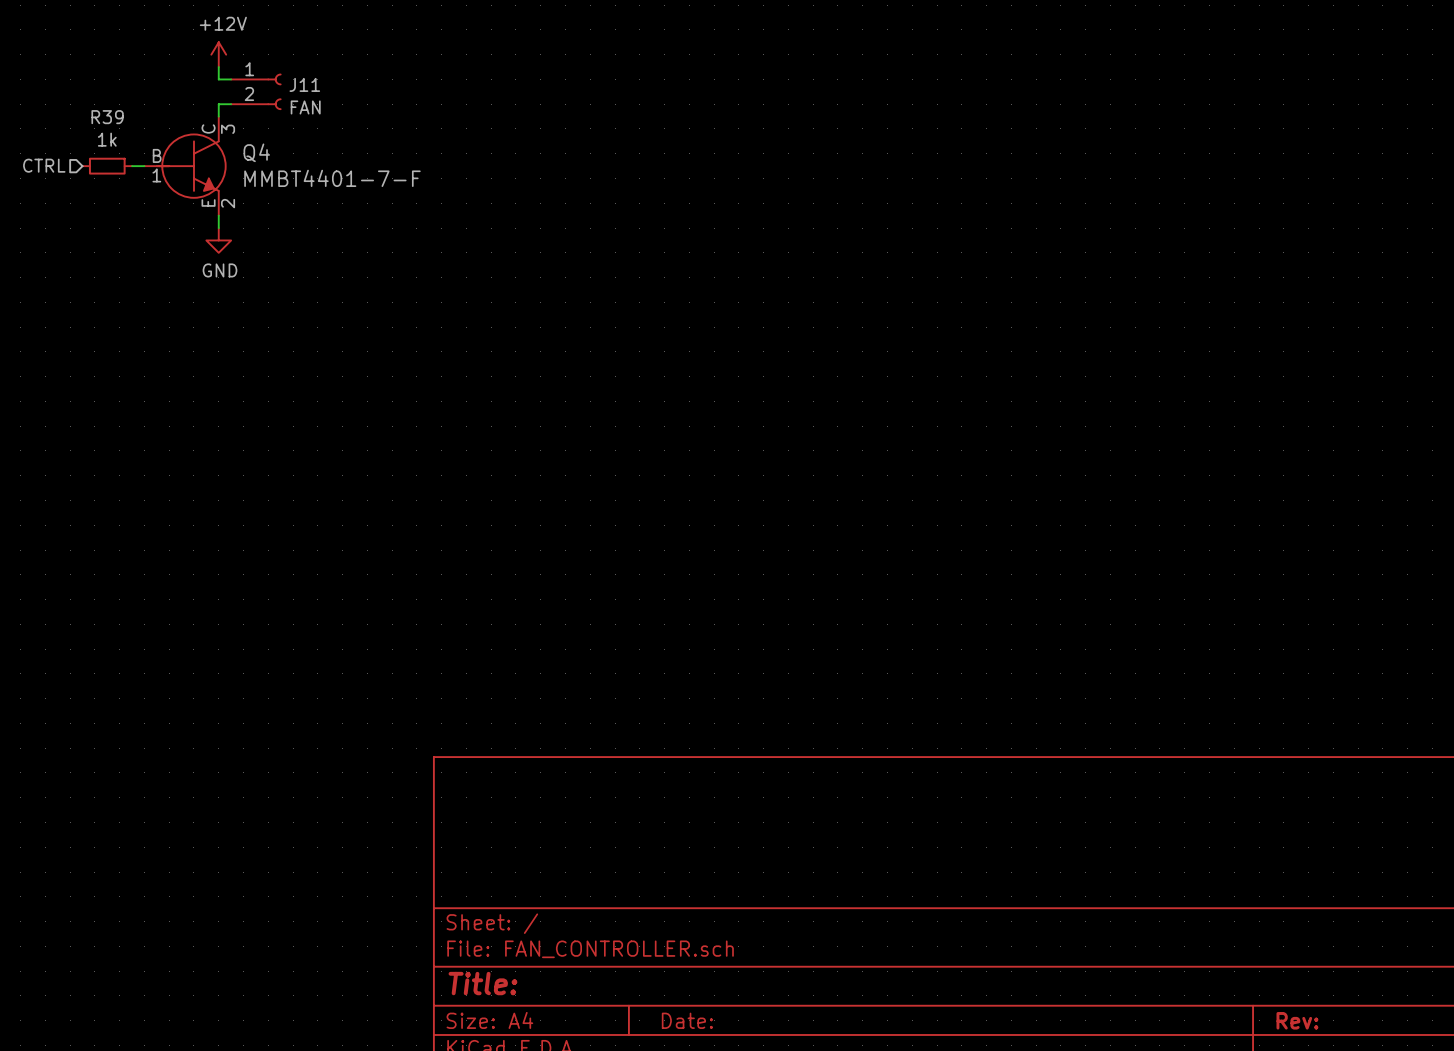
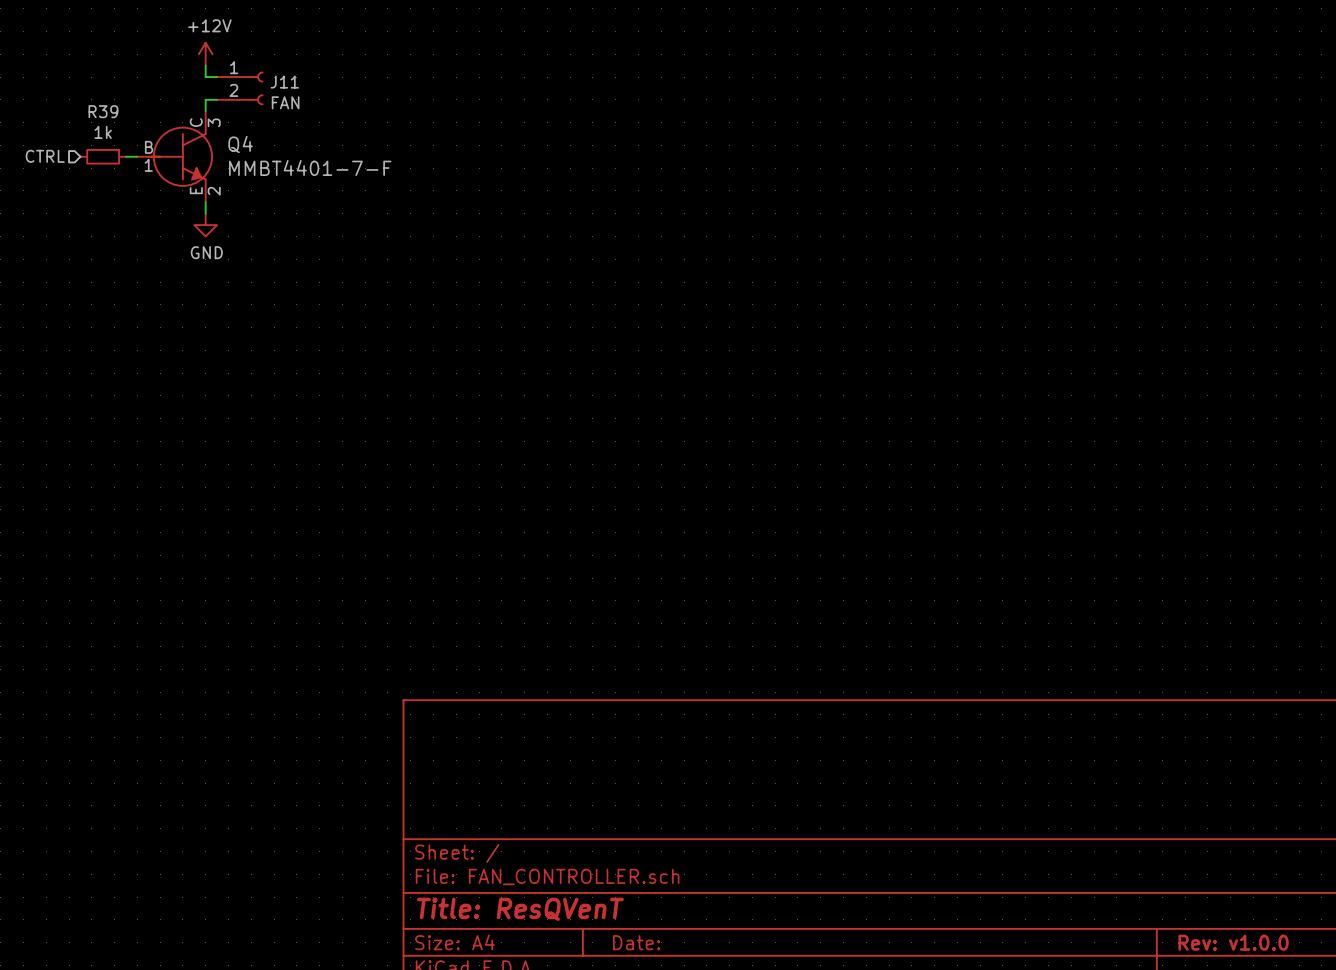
title block: Title: (482, 983) -> Title: ResQVenT (520, 909)
title block: Rev: (1297, 1020) -> Rev: v1.0.0 (1233, 942)

